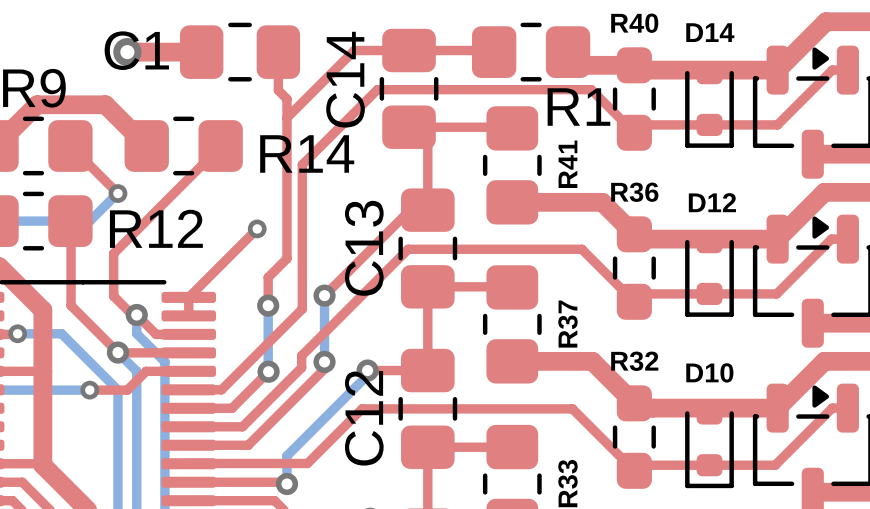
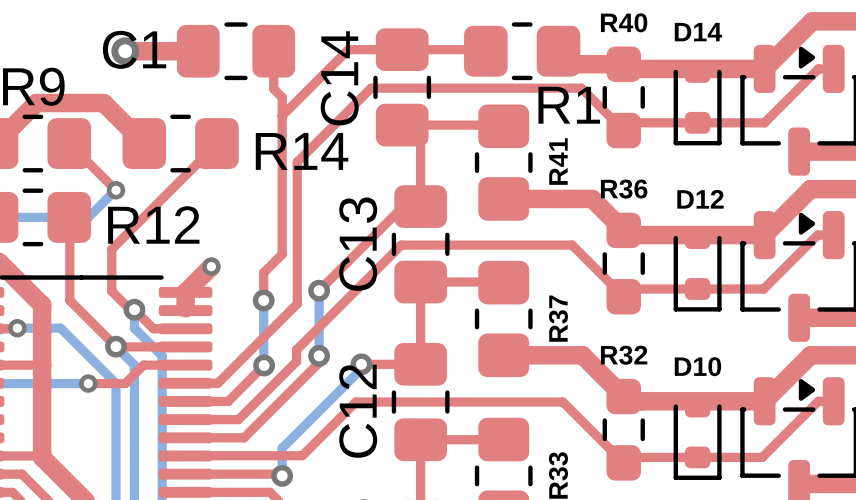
top track: (257, 228) (214, 271) -> none
via position: (257, 228) -> (211, 266)
top track width: thin (214, 271) (188, 297) (188, 313) -> thick (211, 266) (185, 292) (185, 308)

